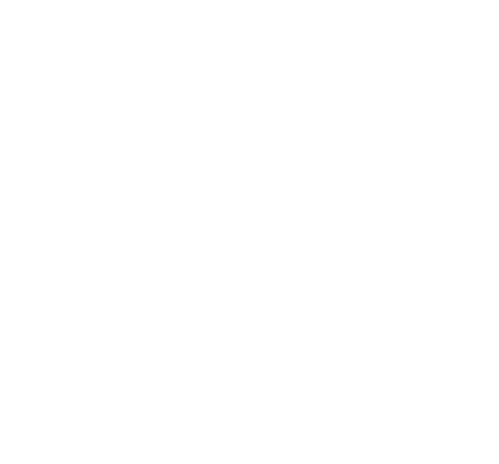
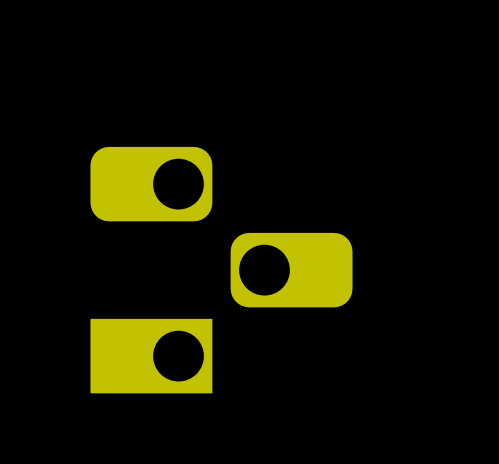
part: none -> (221, 270)

